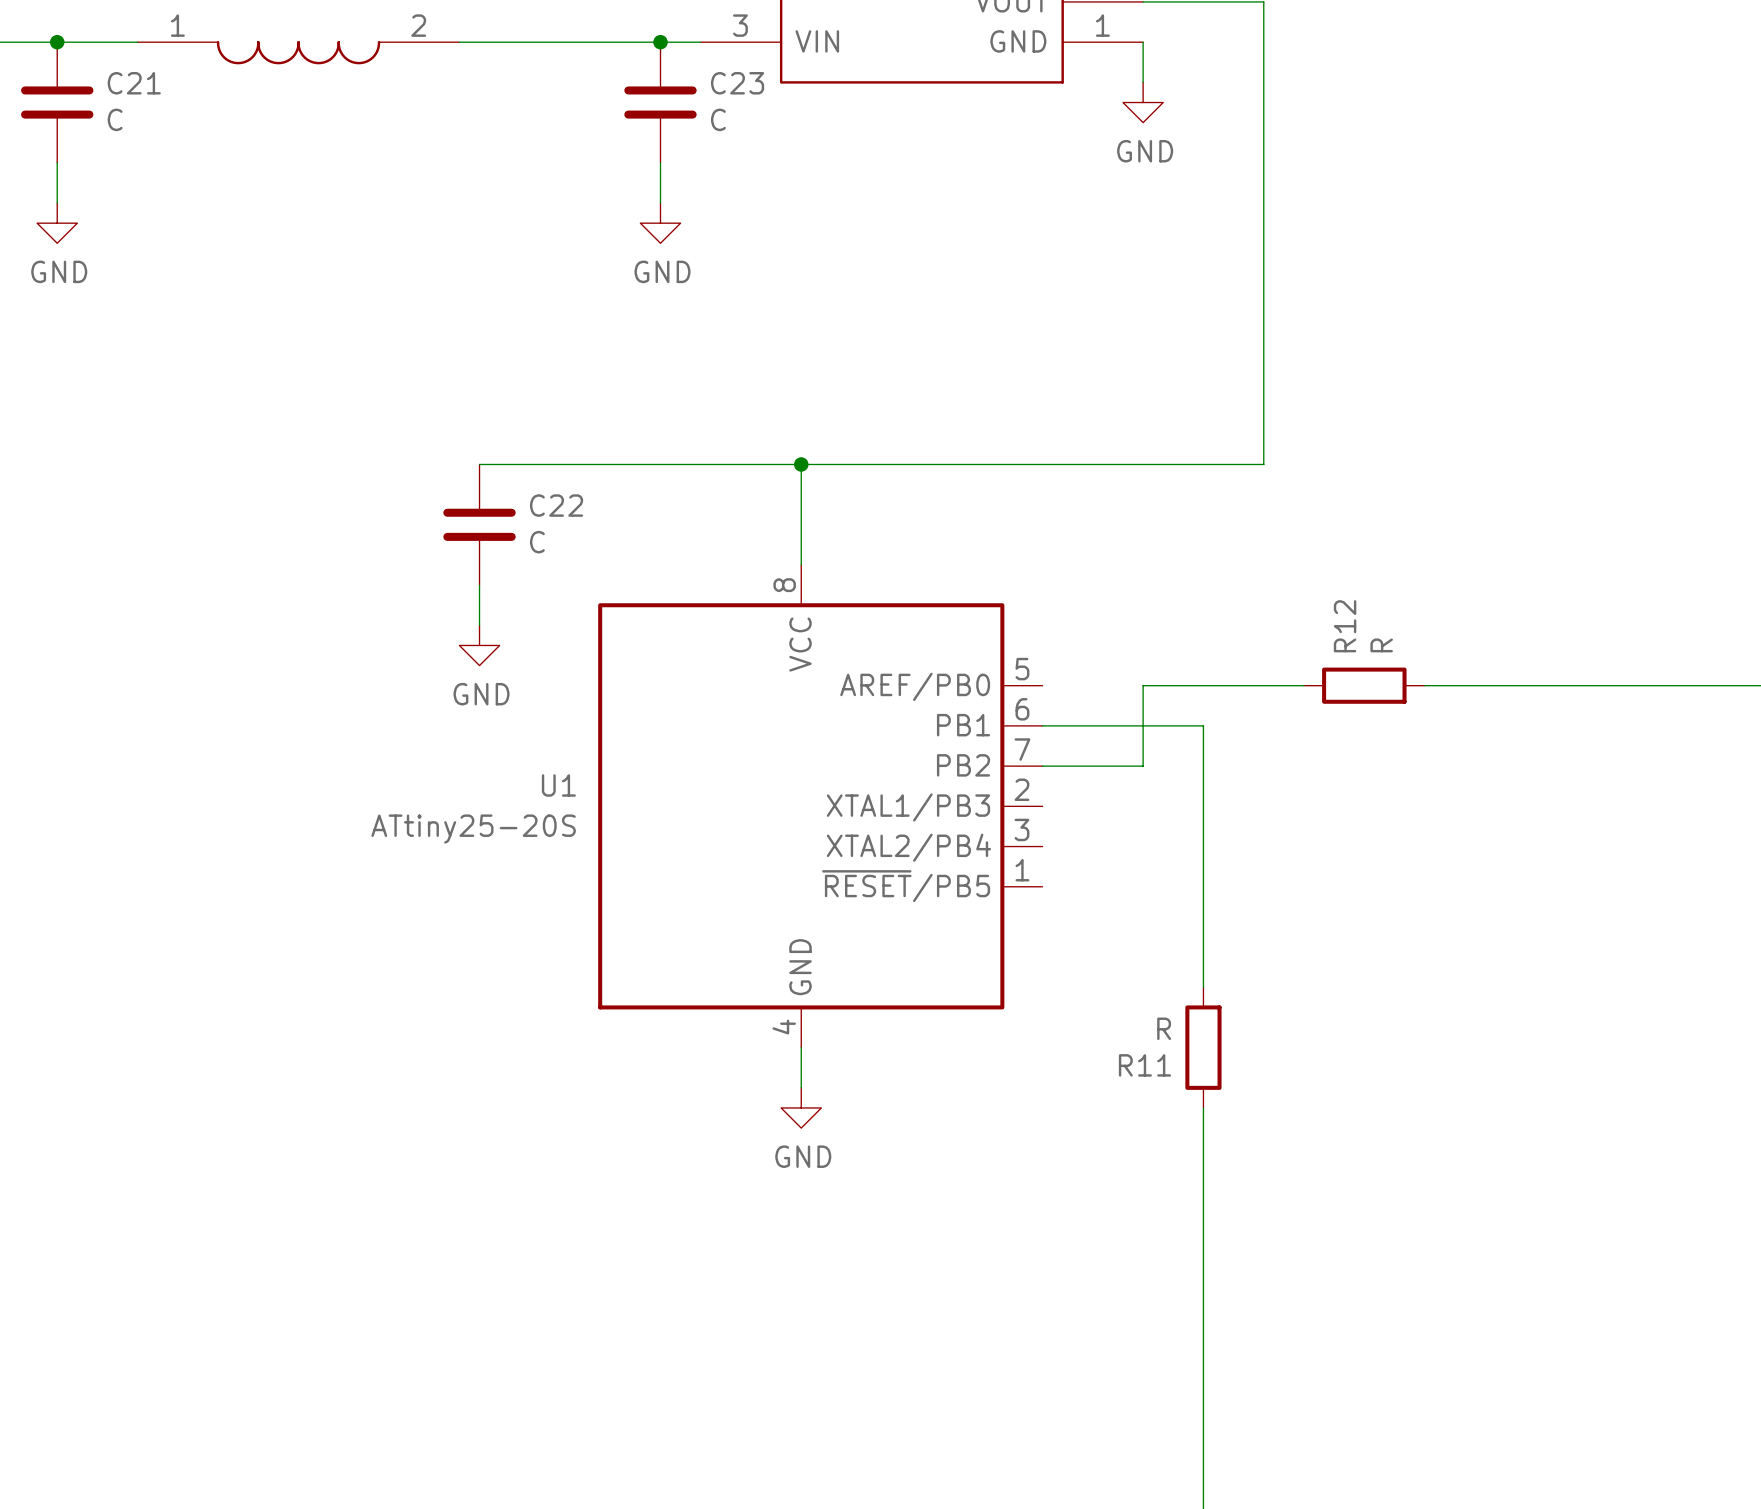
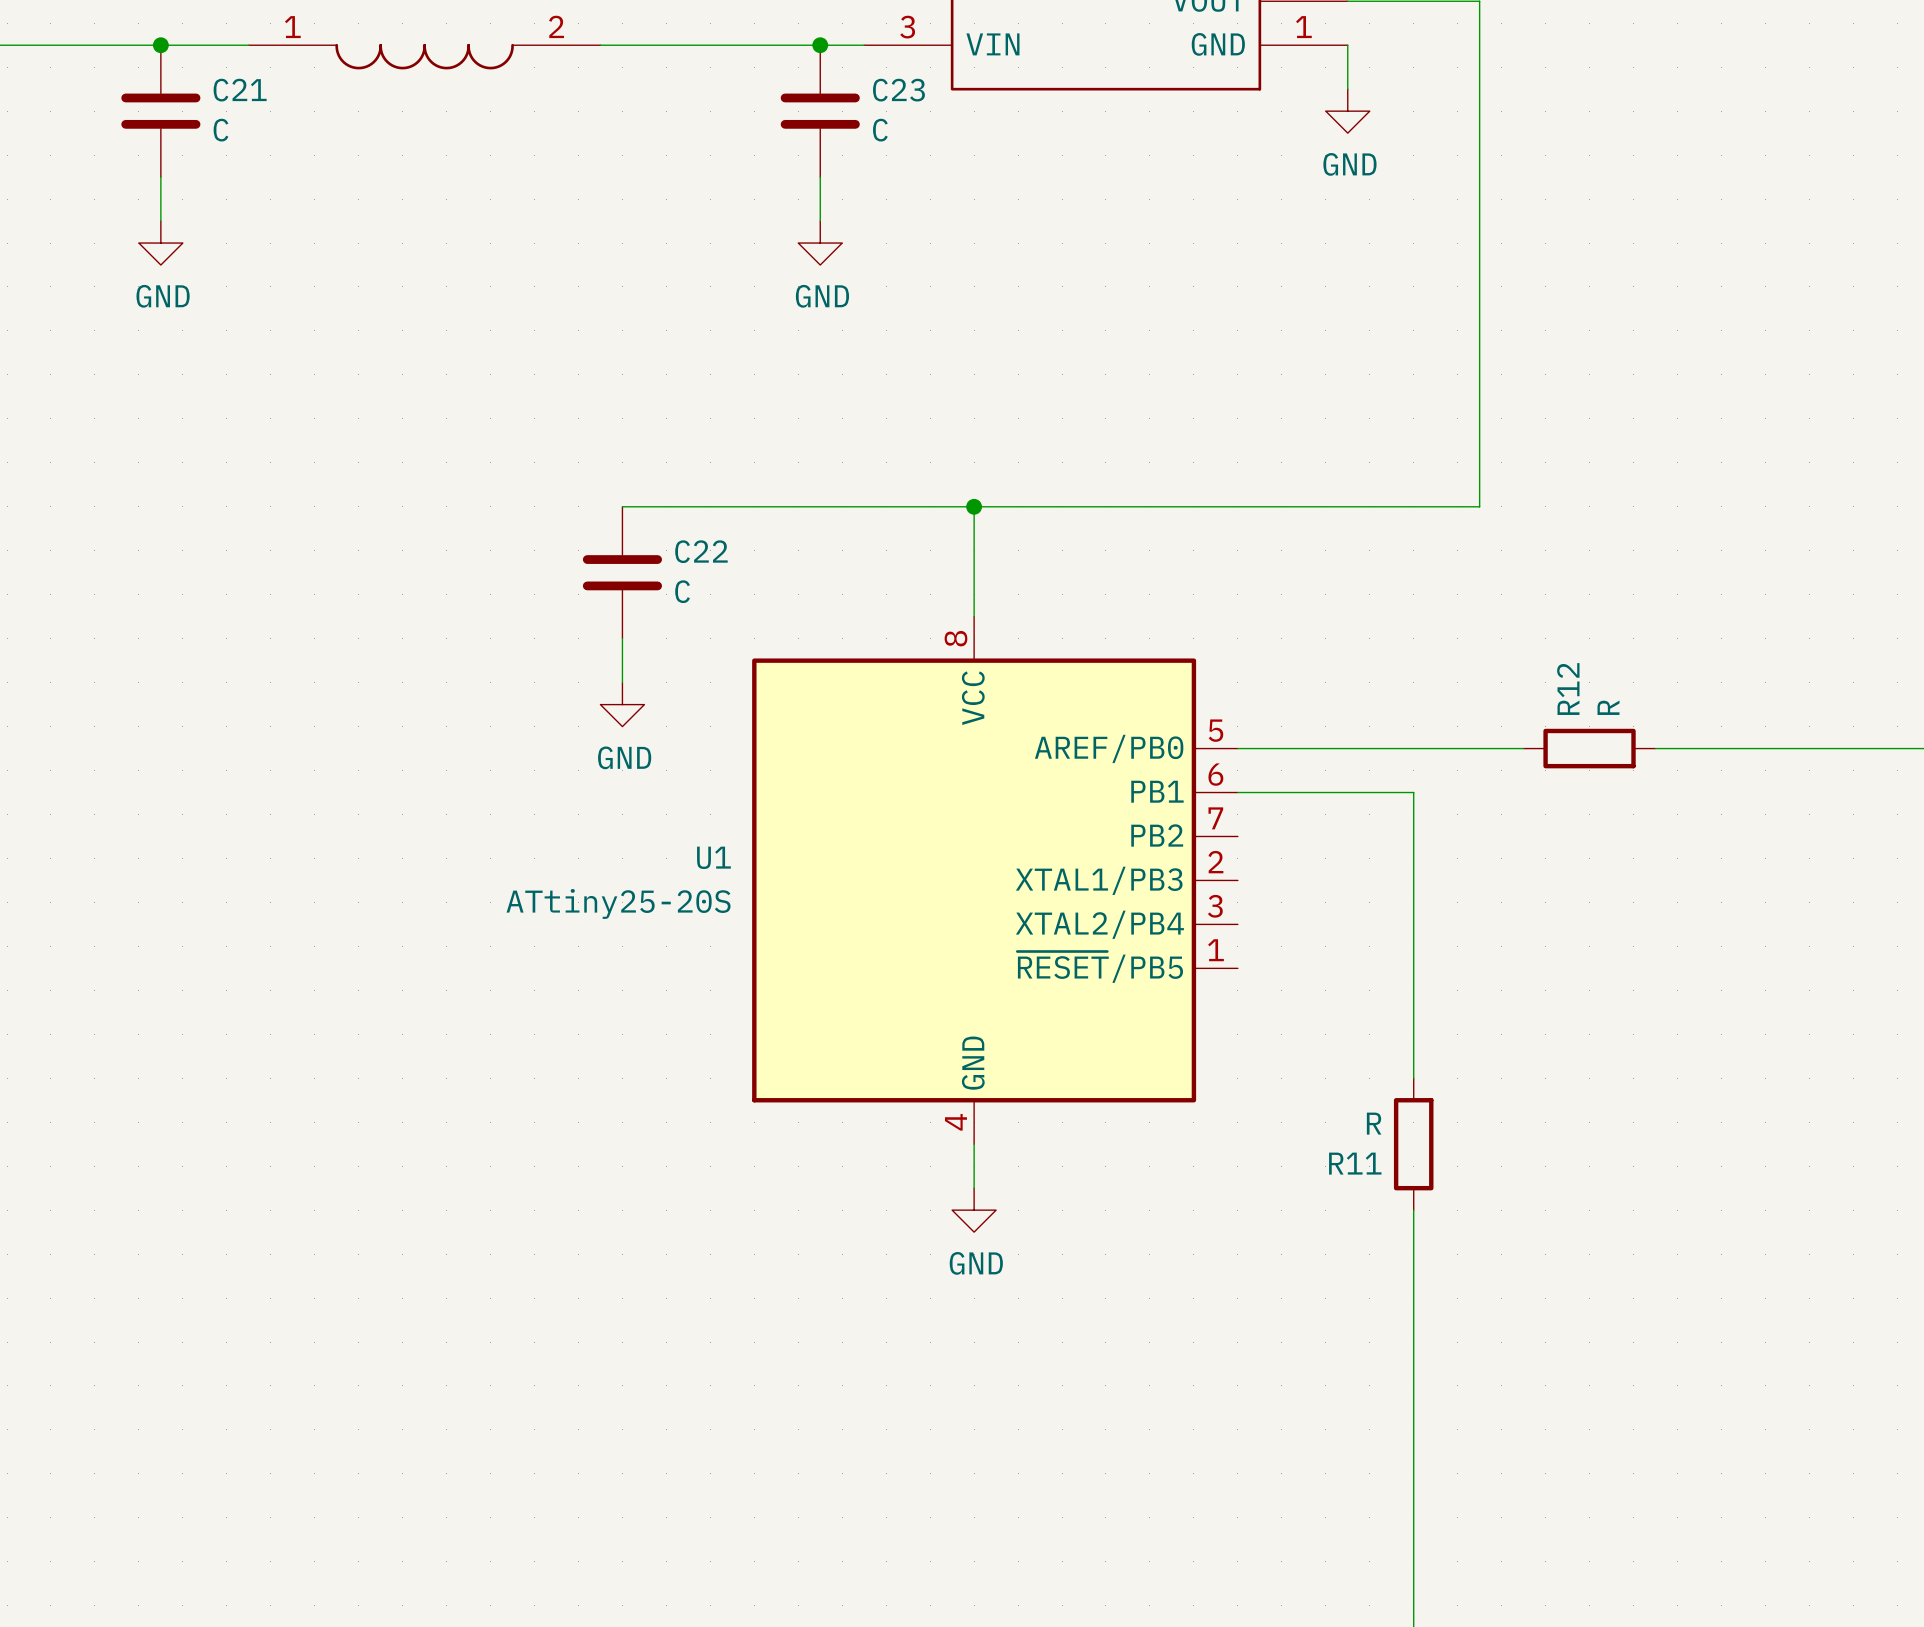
wire: (1143, 685) (1143, 766) (1042, 766) -> (1347, 748) (1237, 748)

